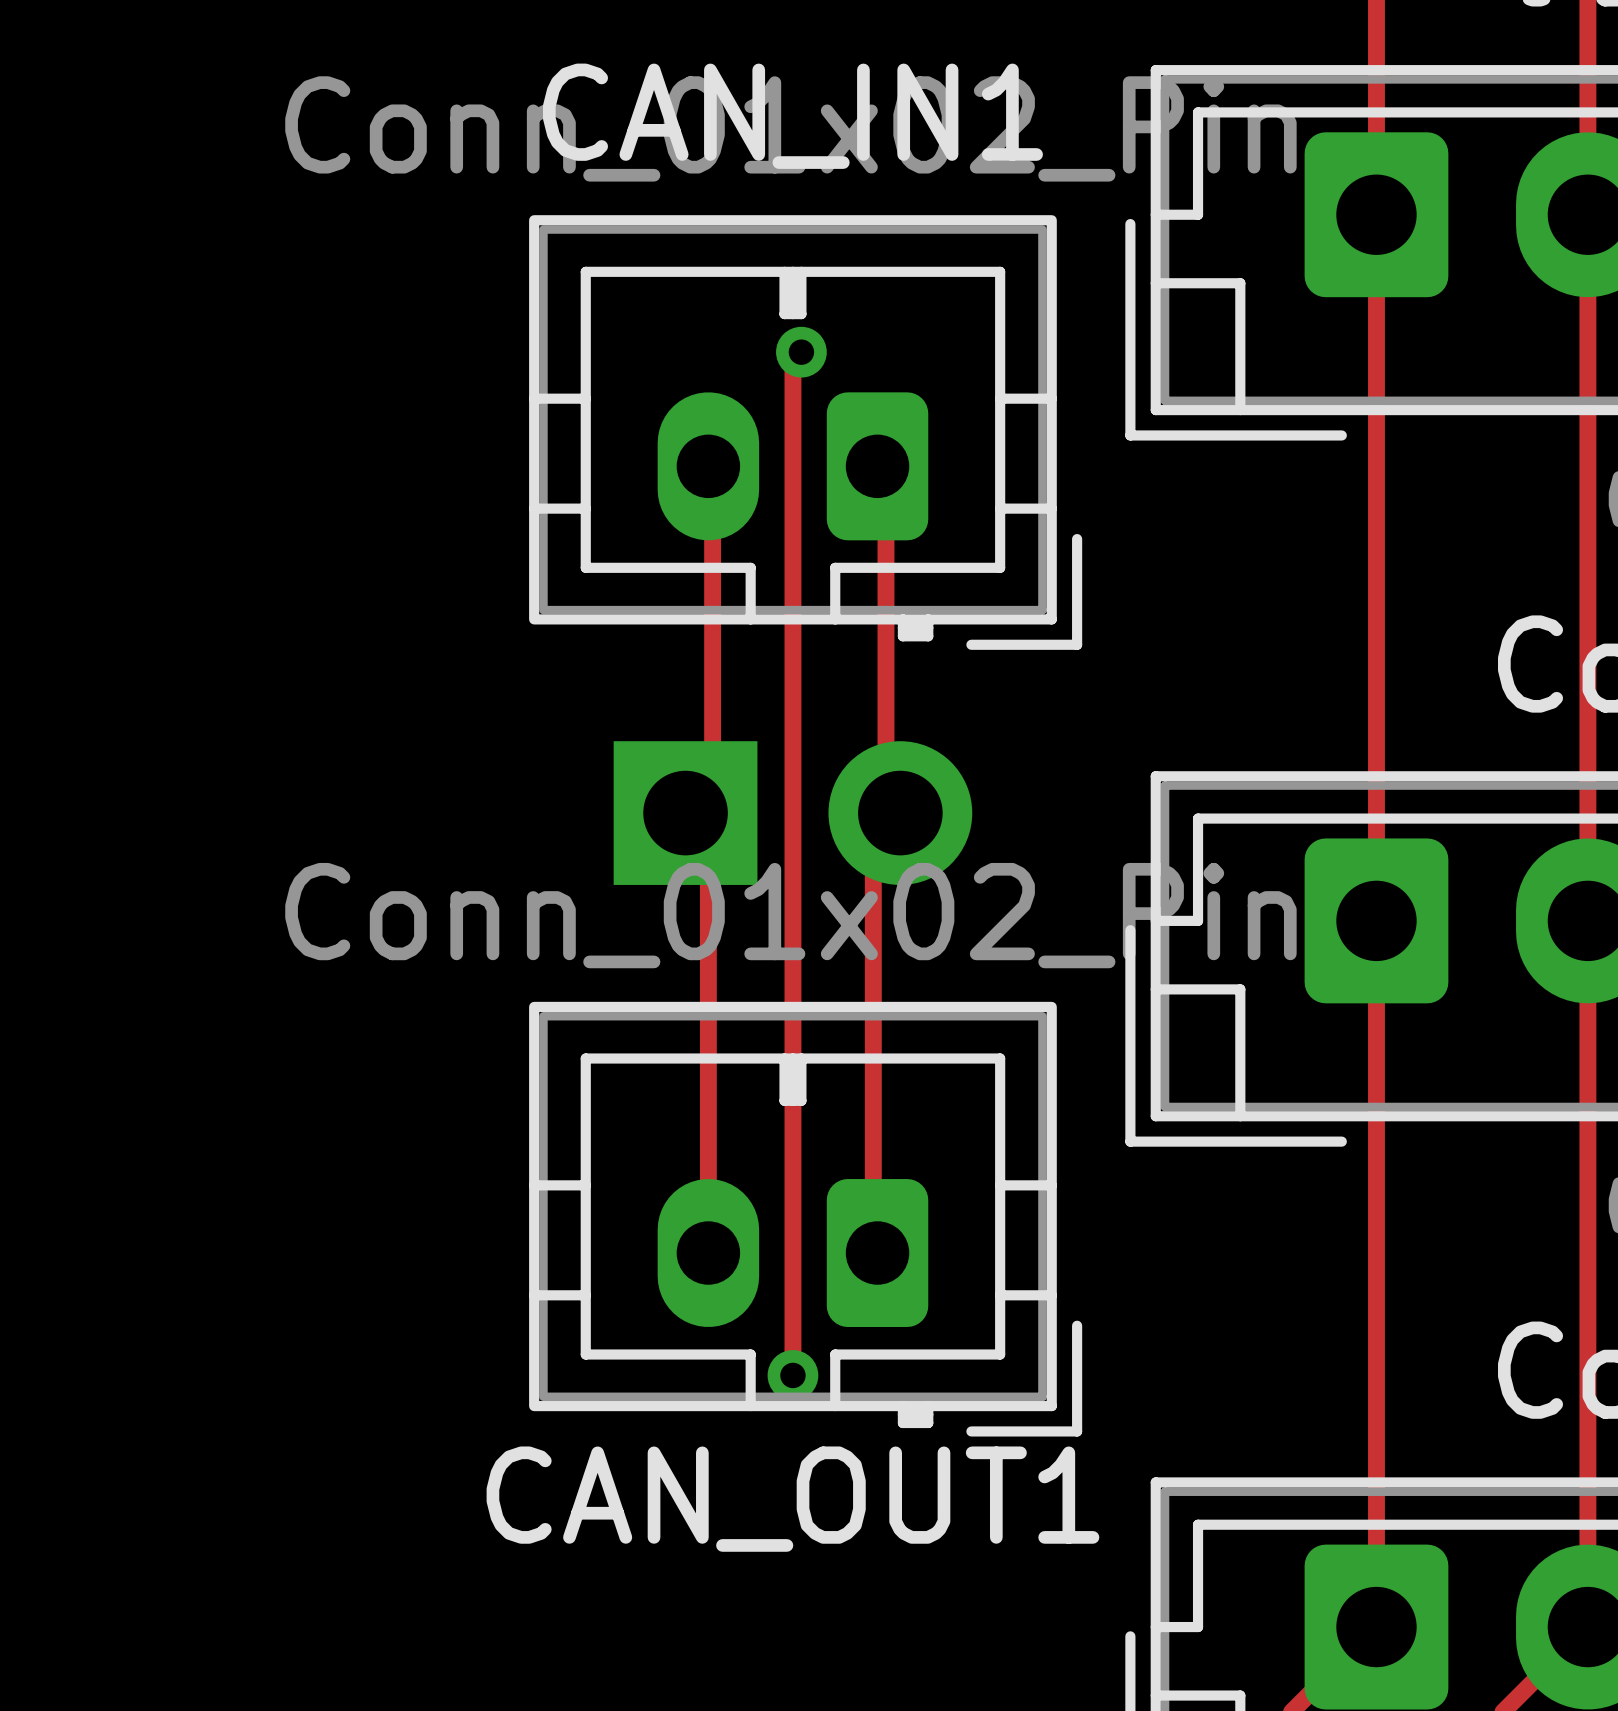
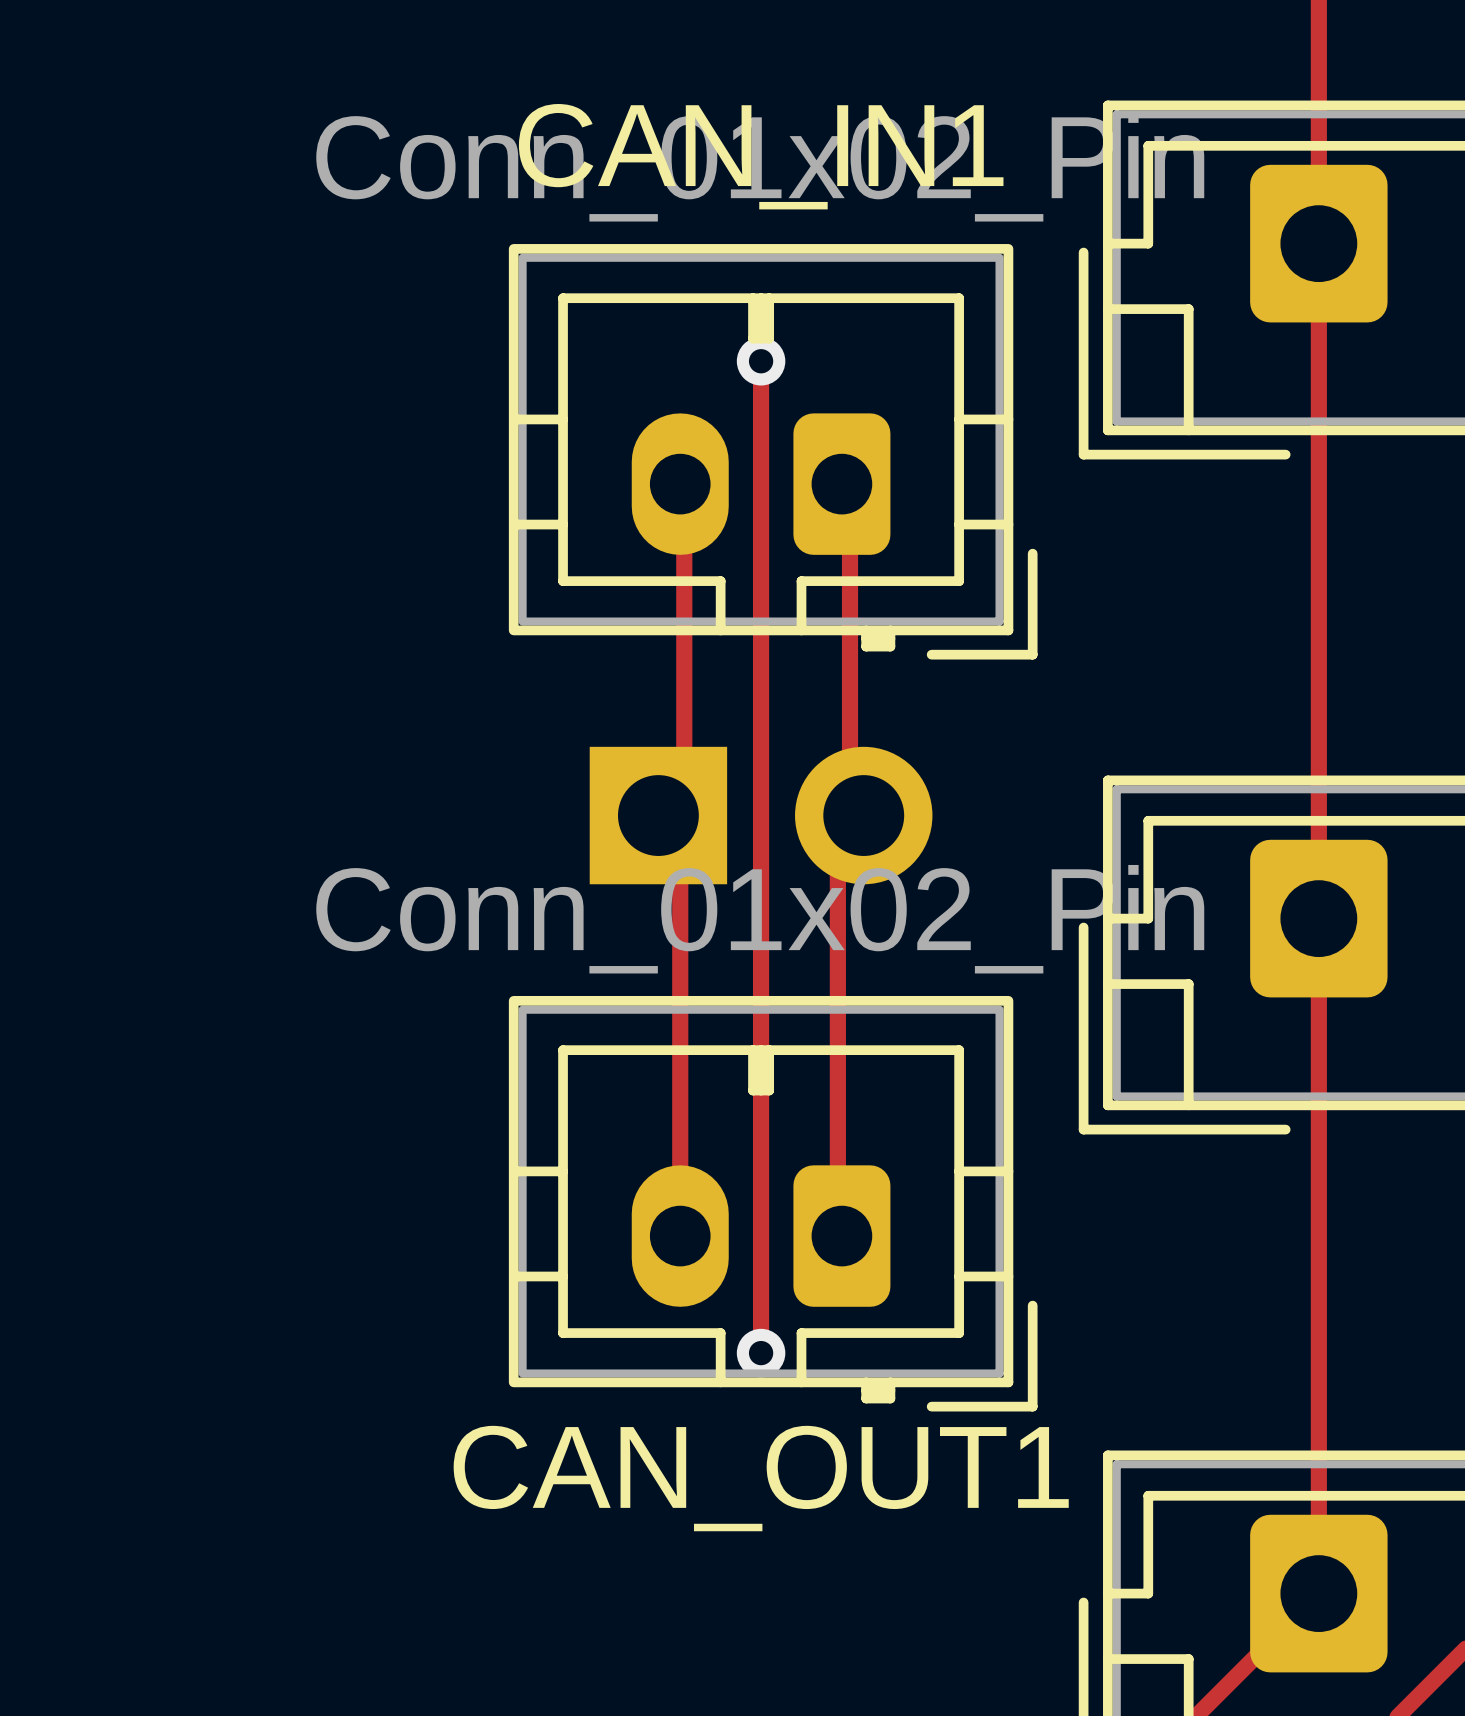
via position: (801, 352) -> (761, 361)

